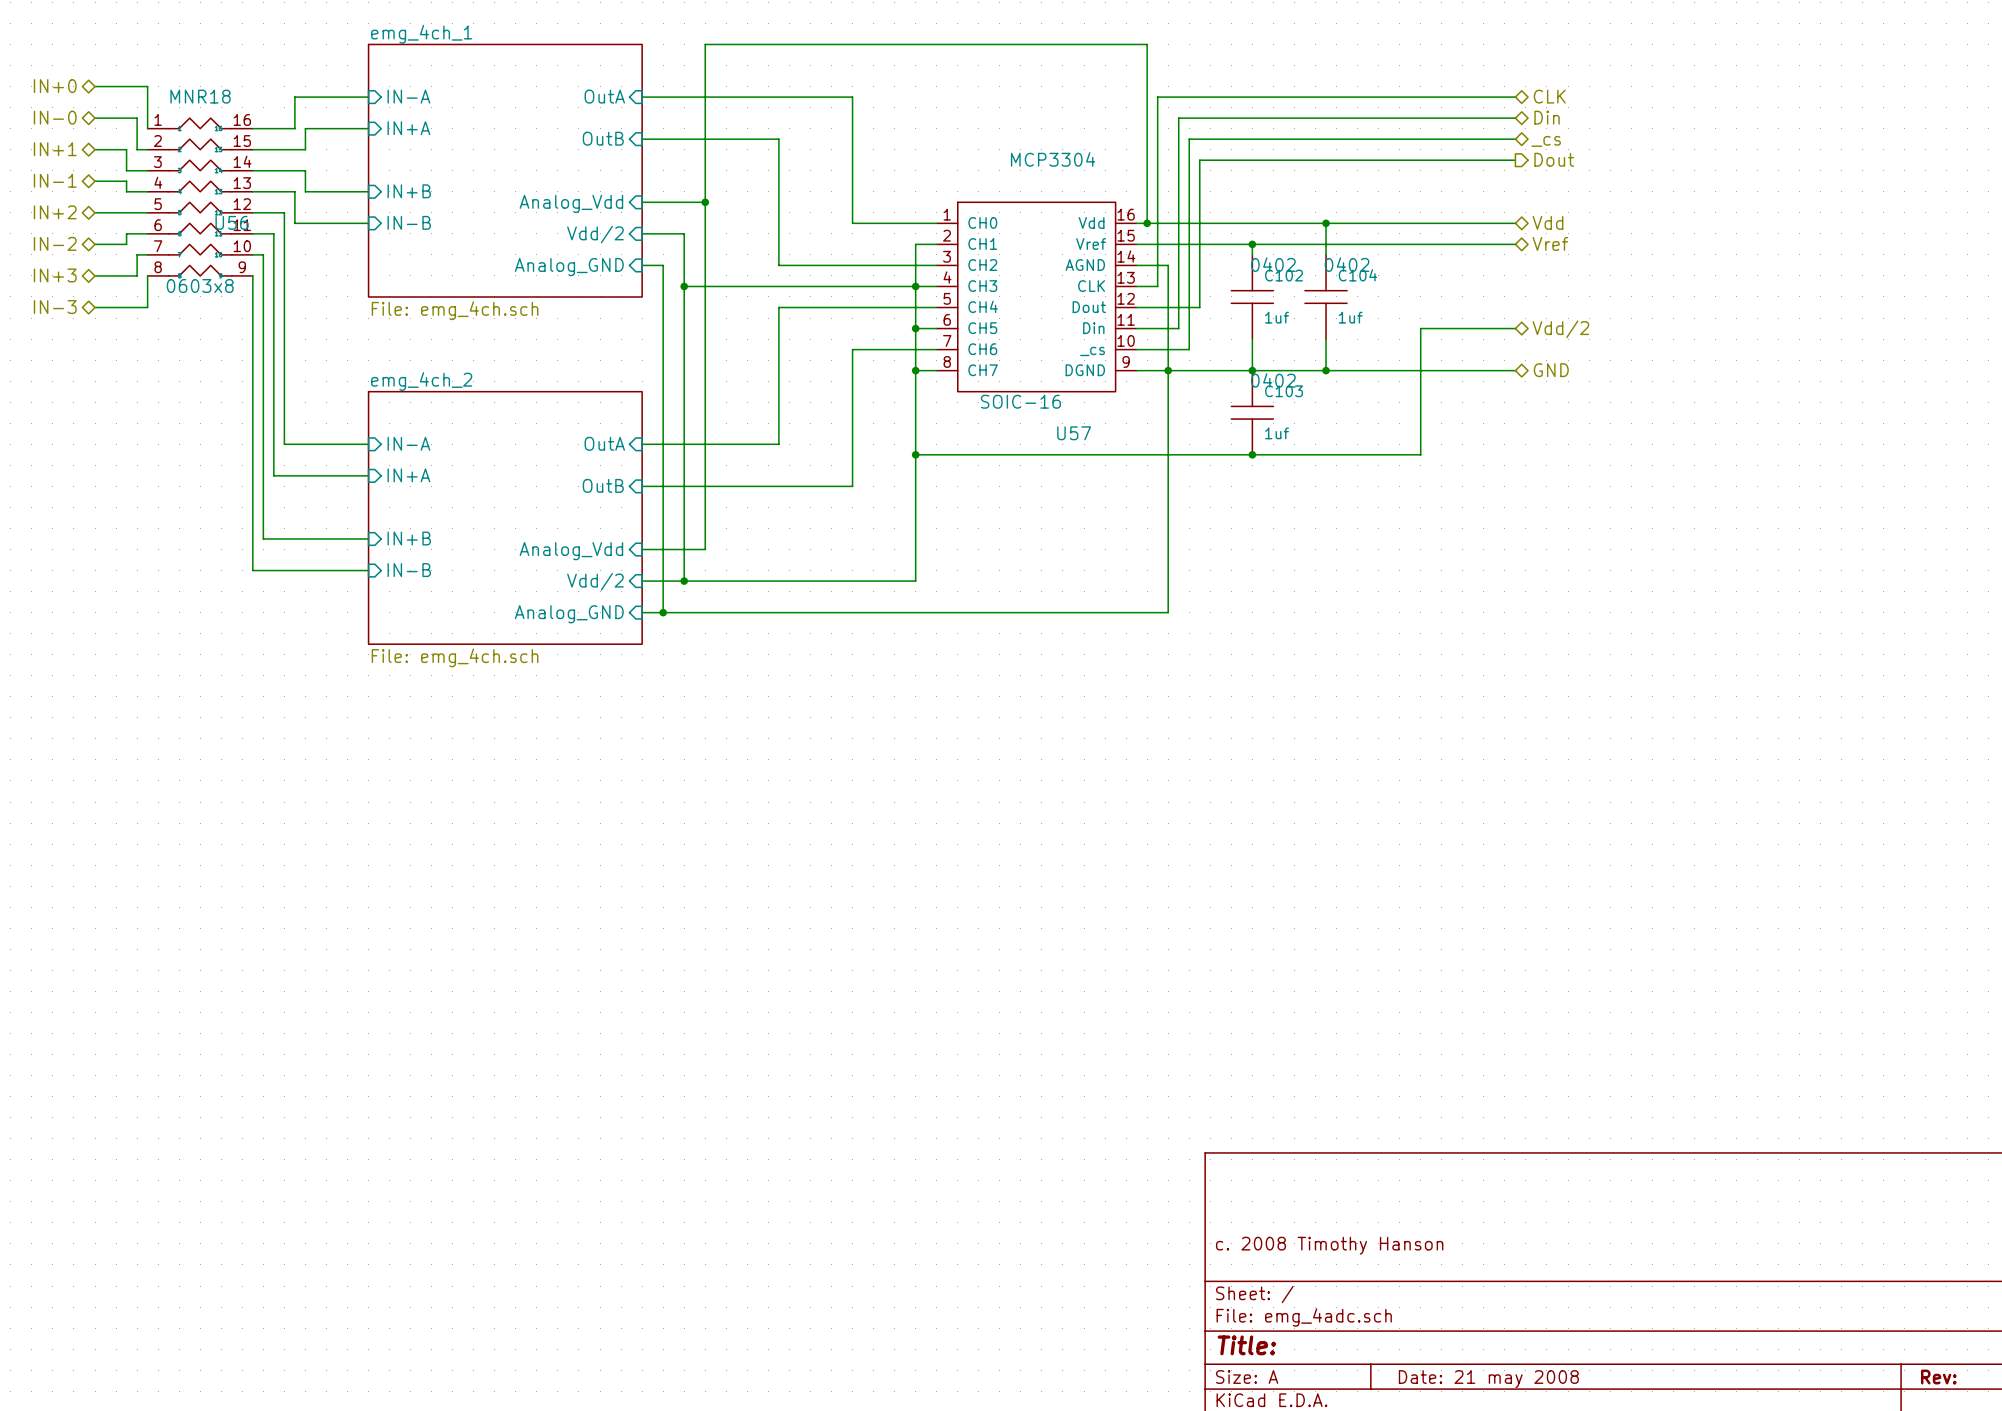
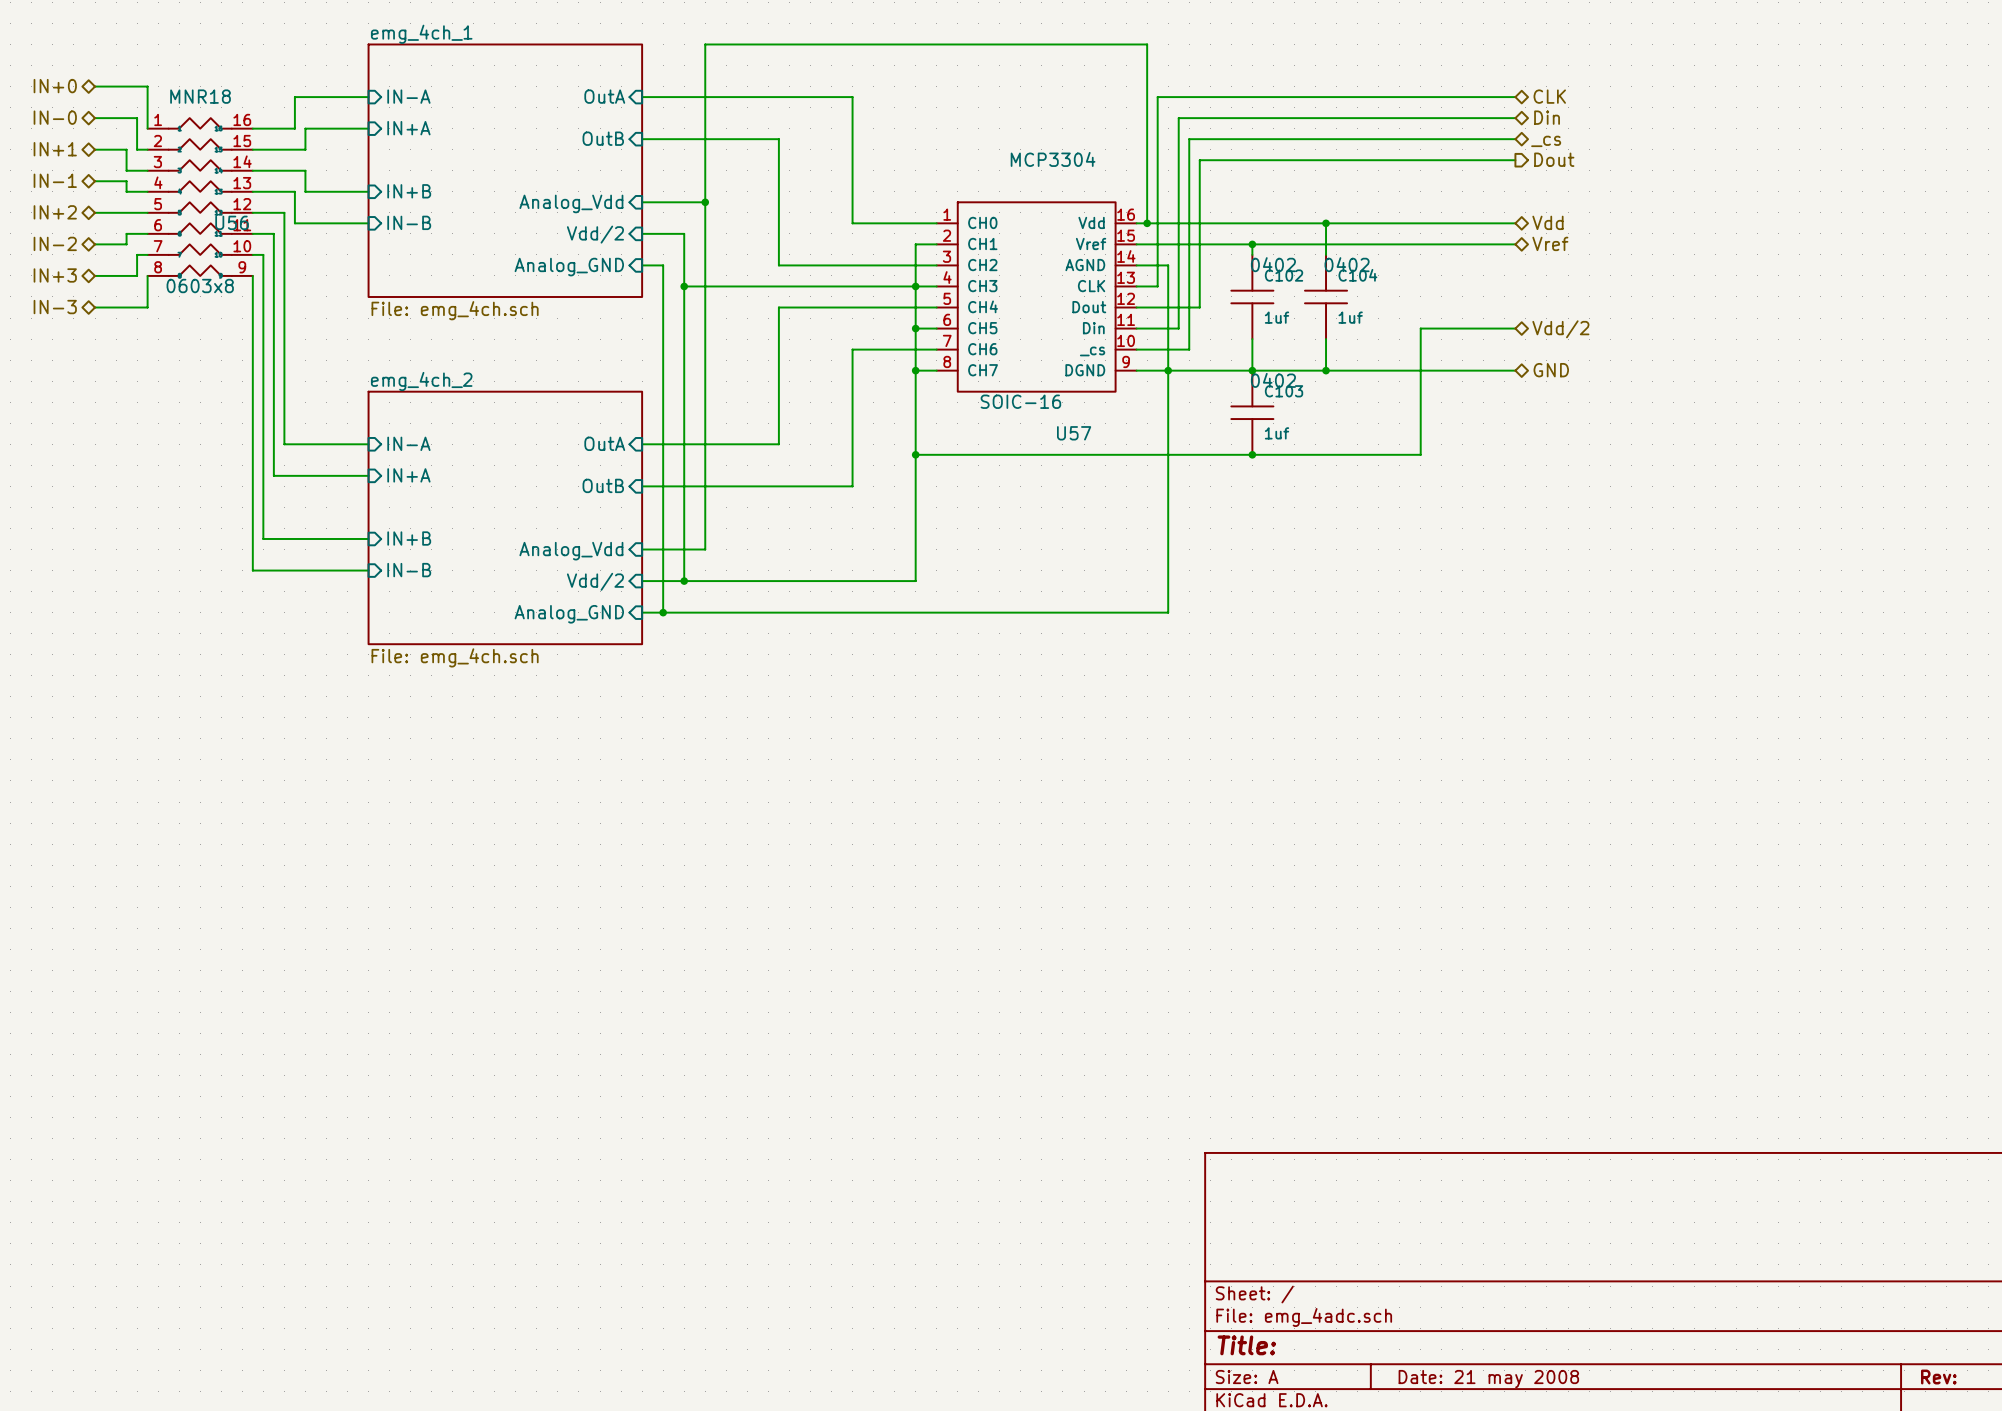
title block: c. 2008 Timothy Hanson (1329, 1245) -> none

